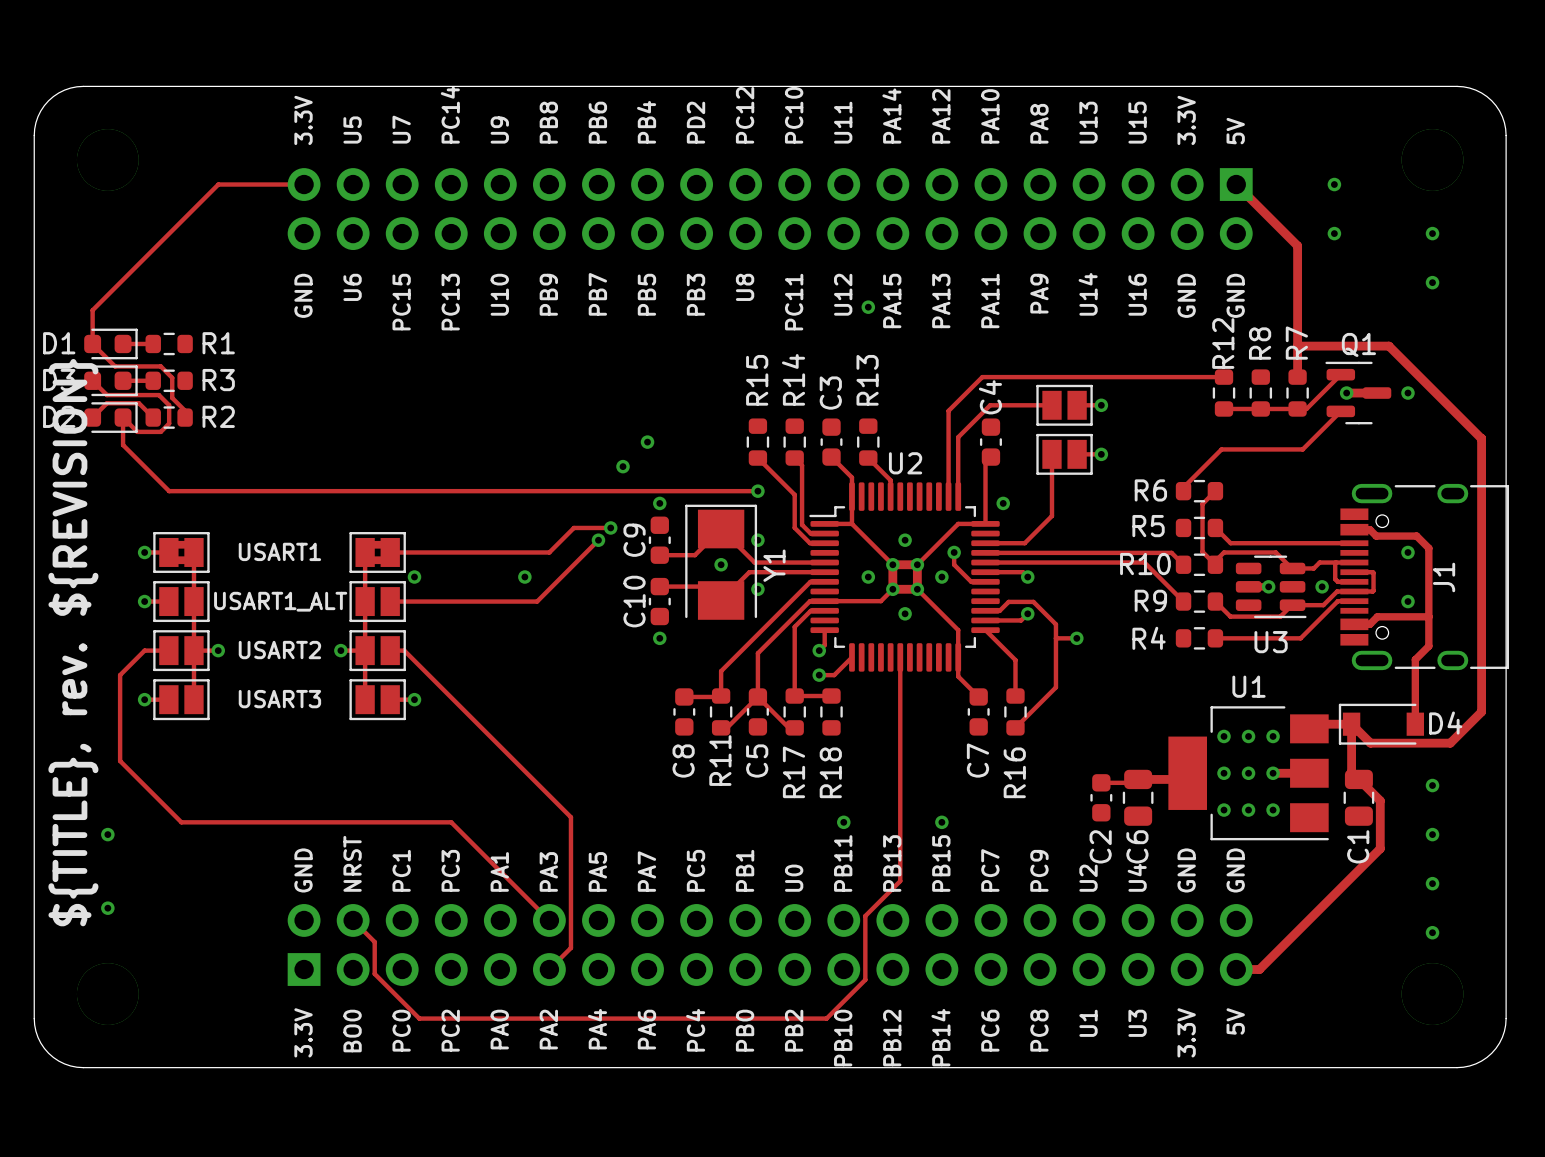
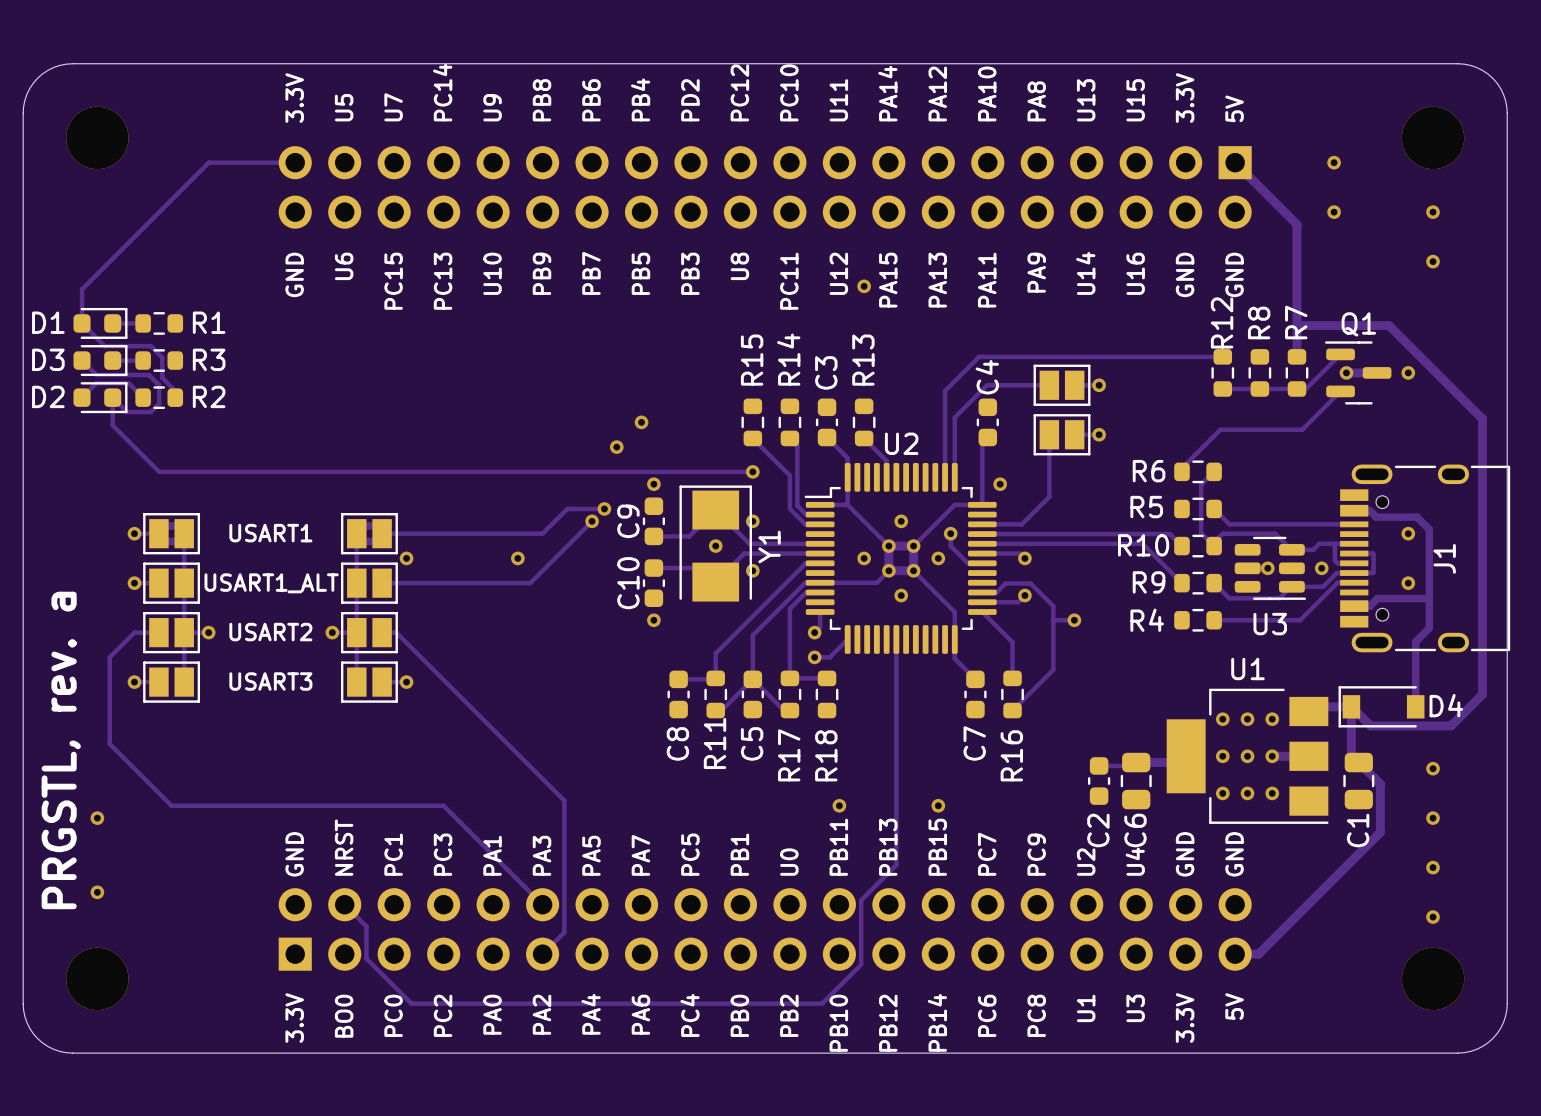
text: ${TITLE}, rev. ${REVISION} (73, 642) -> PRGSTL, rev. a (61, 750)

